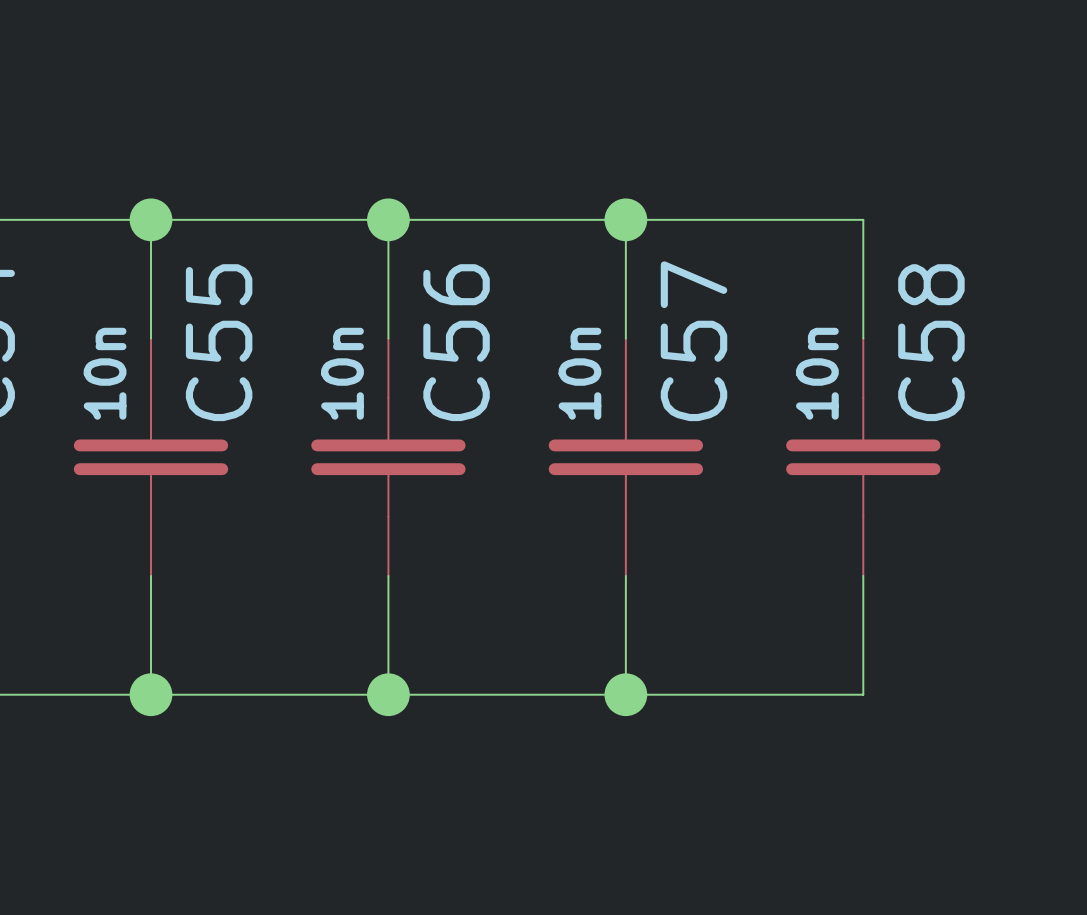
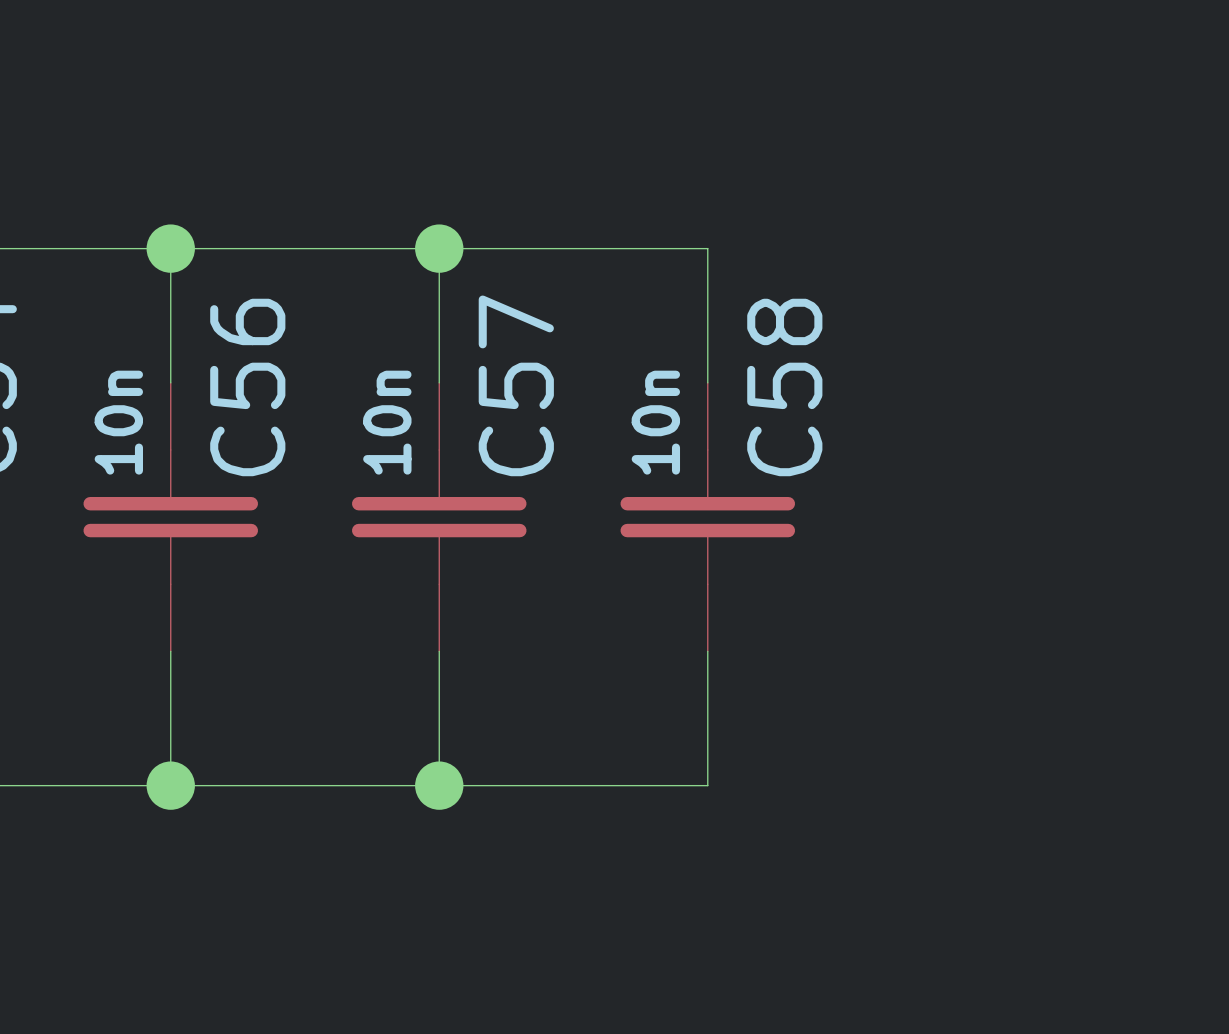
wire: (625, 219) (863, 219) (863, 338) -> none
junction: (625, 219) -> none
C57 name: C57 (693, 341) -> C58 (784, 387)
C55 name: C55 (219, 342) -> C56 (247, 387)
C56 name: C56 (456, 342) -> C57 (516, 385)
C58: 10n (863, 457) -> none
wire: (863, 576) (863, 694) (625, 694) -> none
junction: (625, 694) -> none

